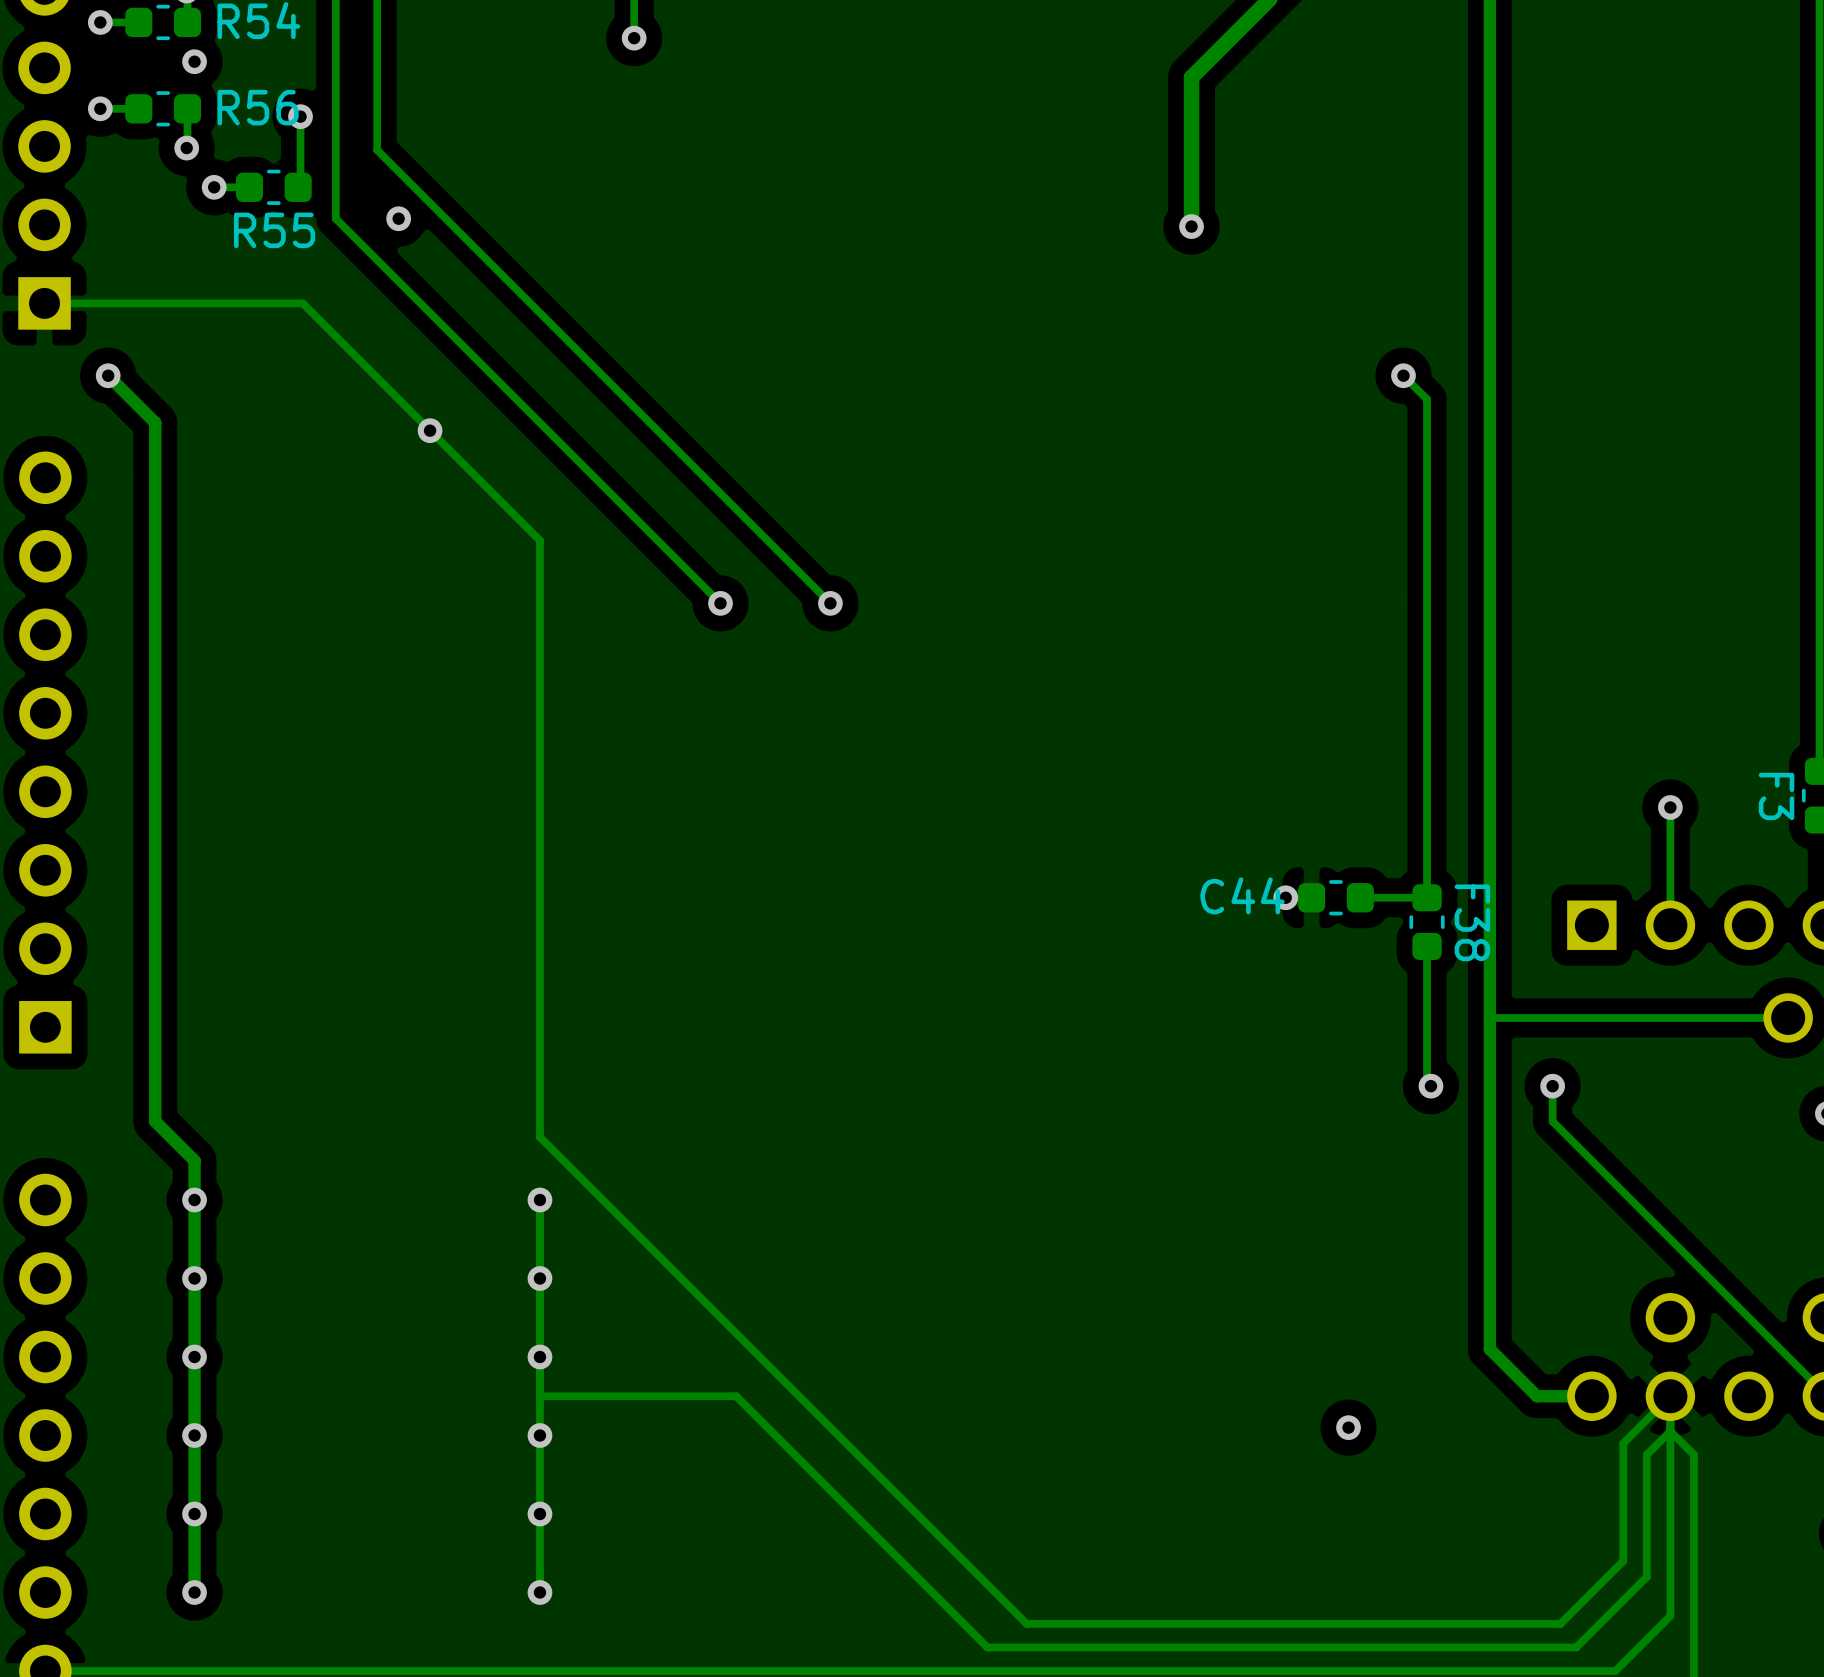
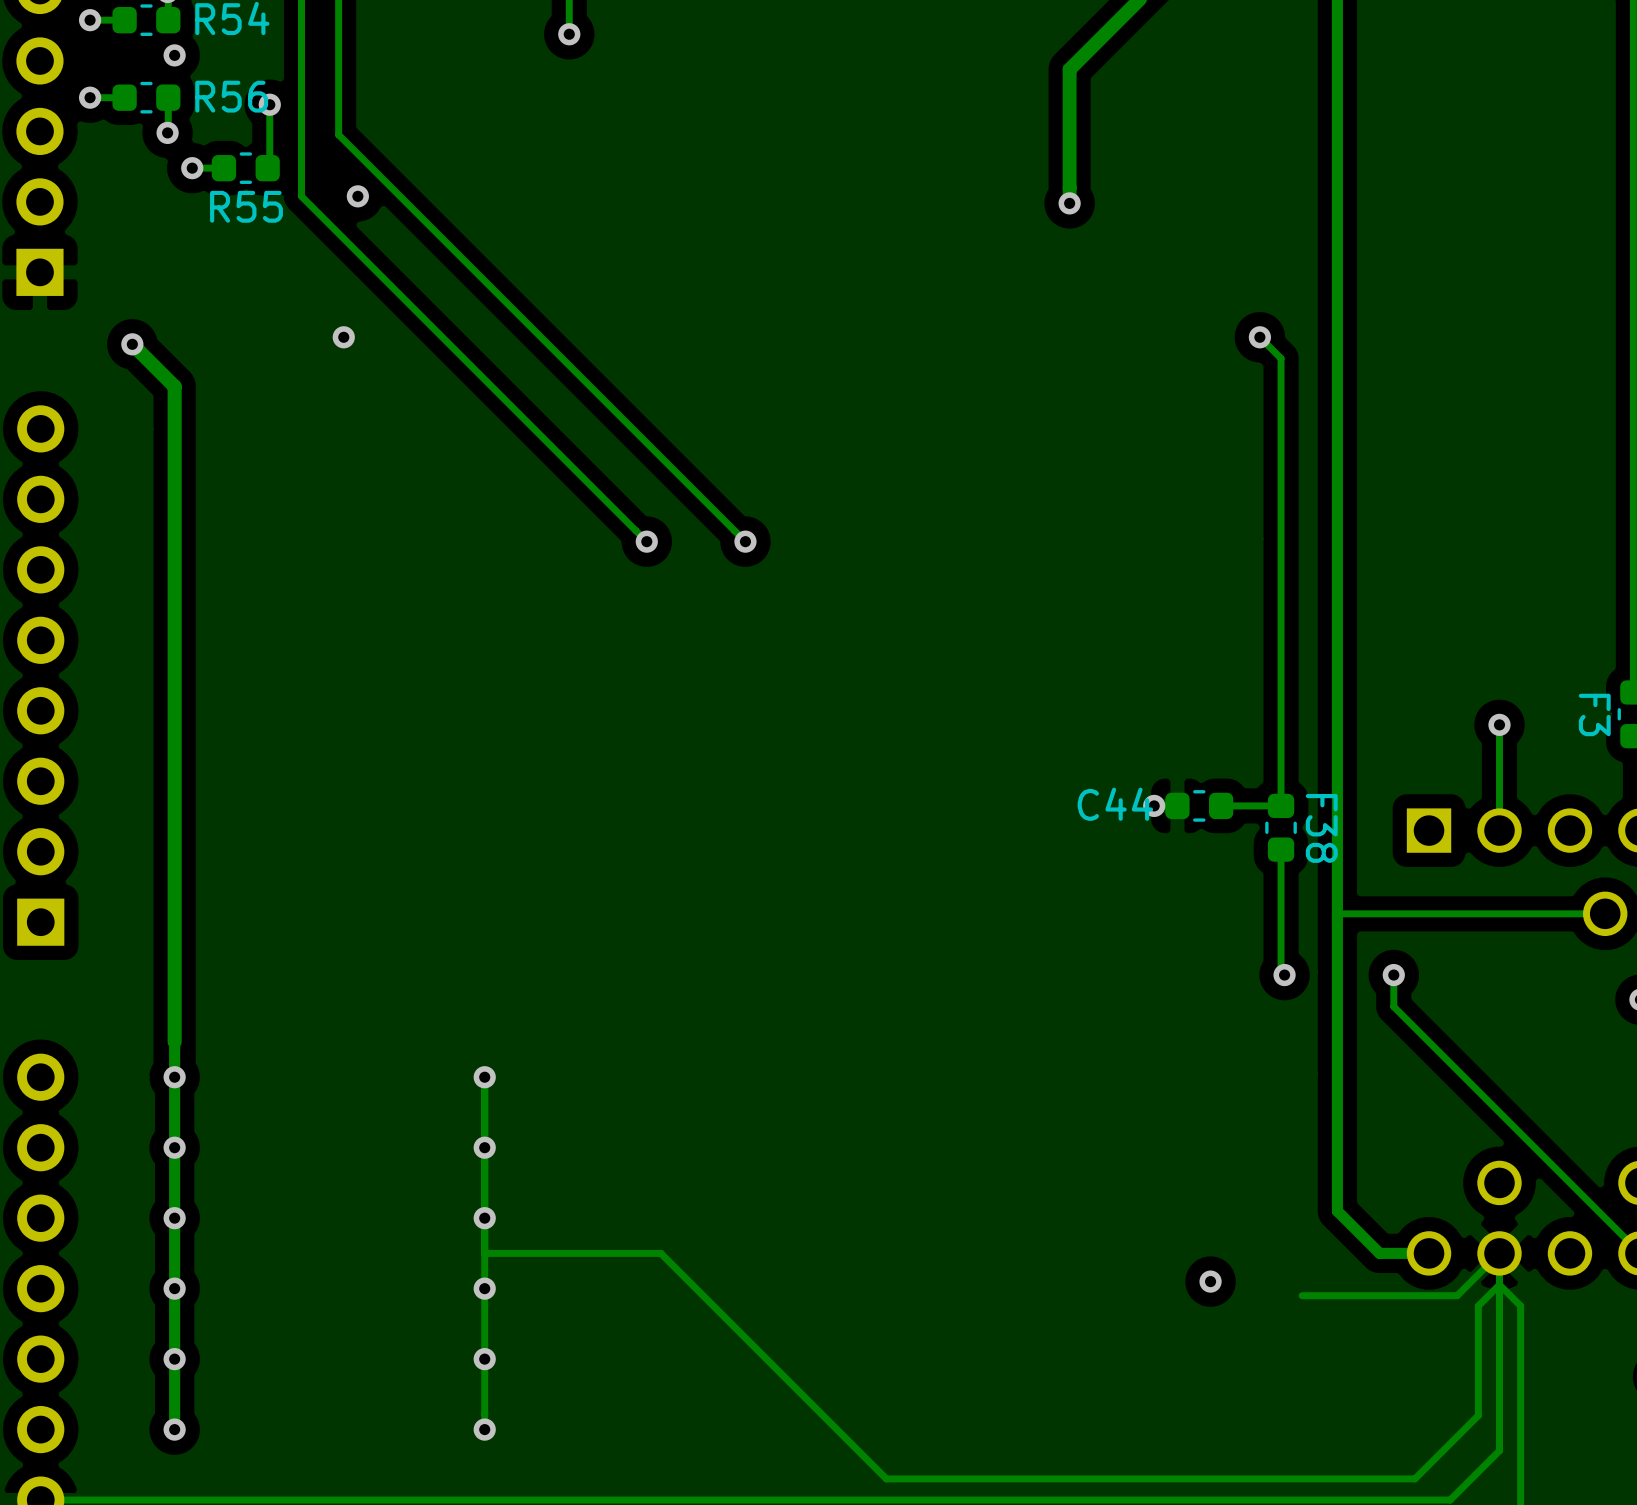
track: (44, 303) (302, 303) (539, 540) (539, 1137) (1026, 1623) (1560, 1623) (1623, 1561) (1623, 1443) -> (1302, 1295) (1457, 1295)
track: (108, 375) (155, 422) (155, 1121) (194, 1160) -> (132, 344) (174, 386) (174, 1041)
via position: (108, 375) -> (132, 344)
via position: (430, 430) -> (343, 337)

